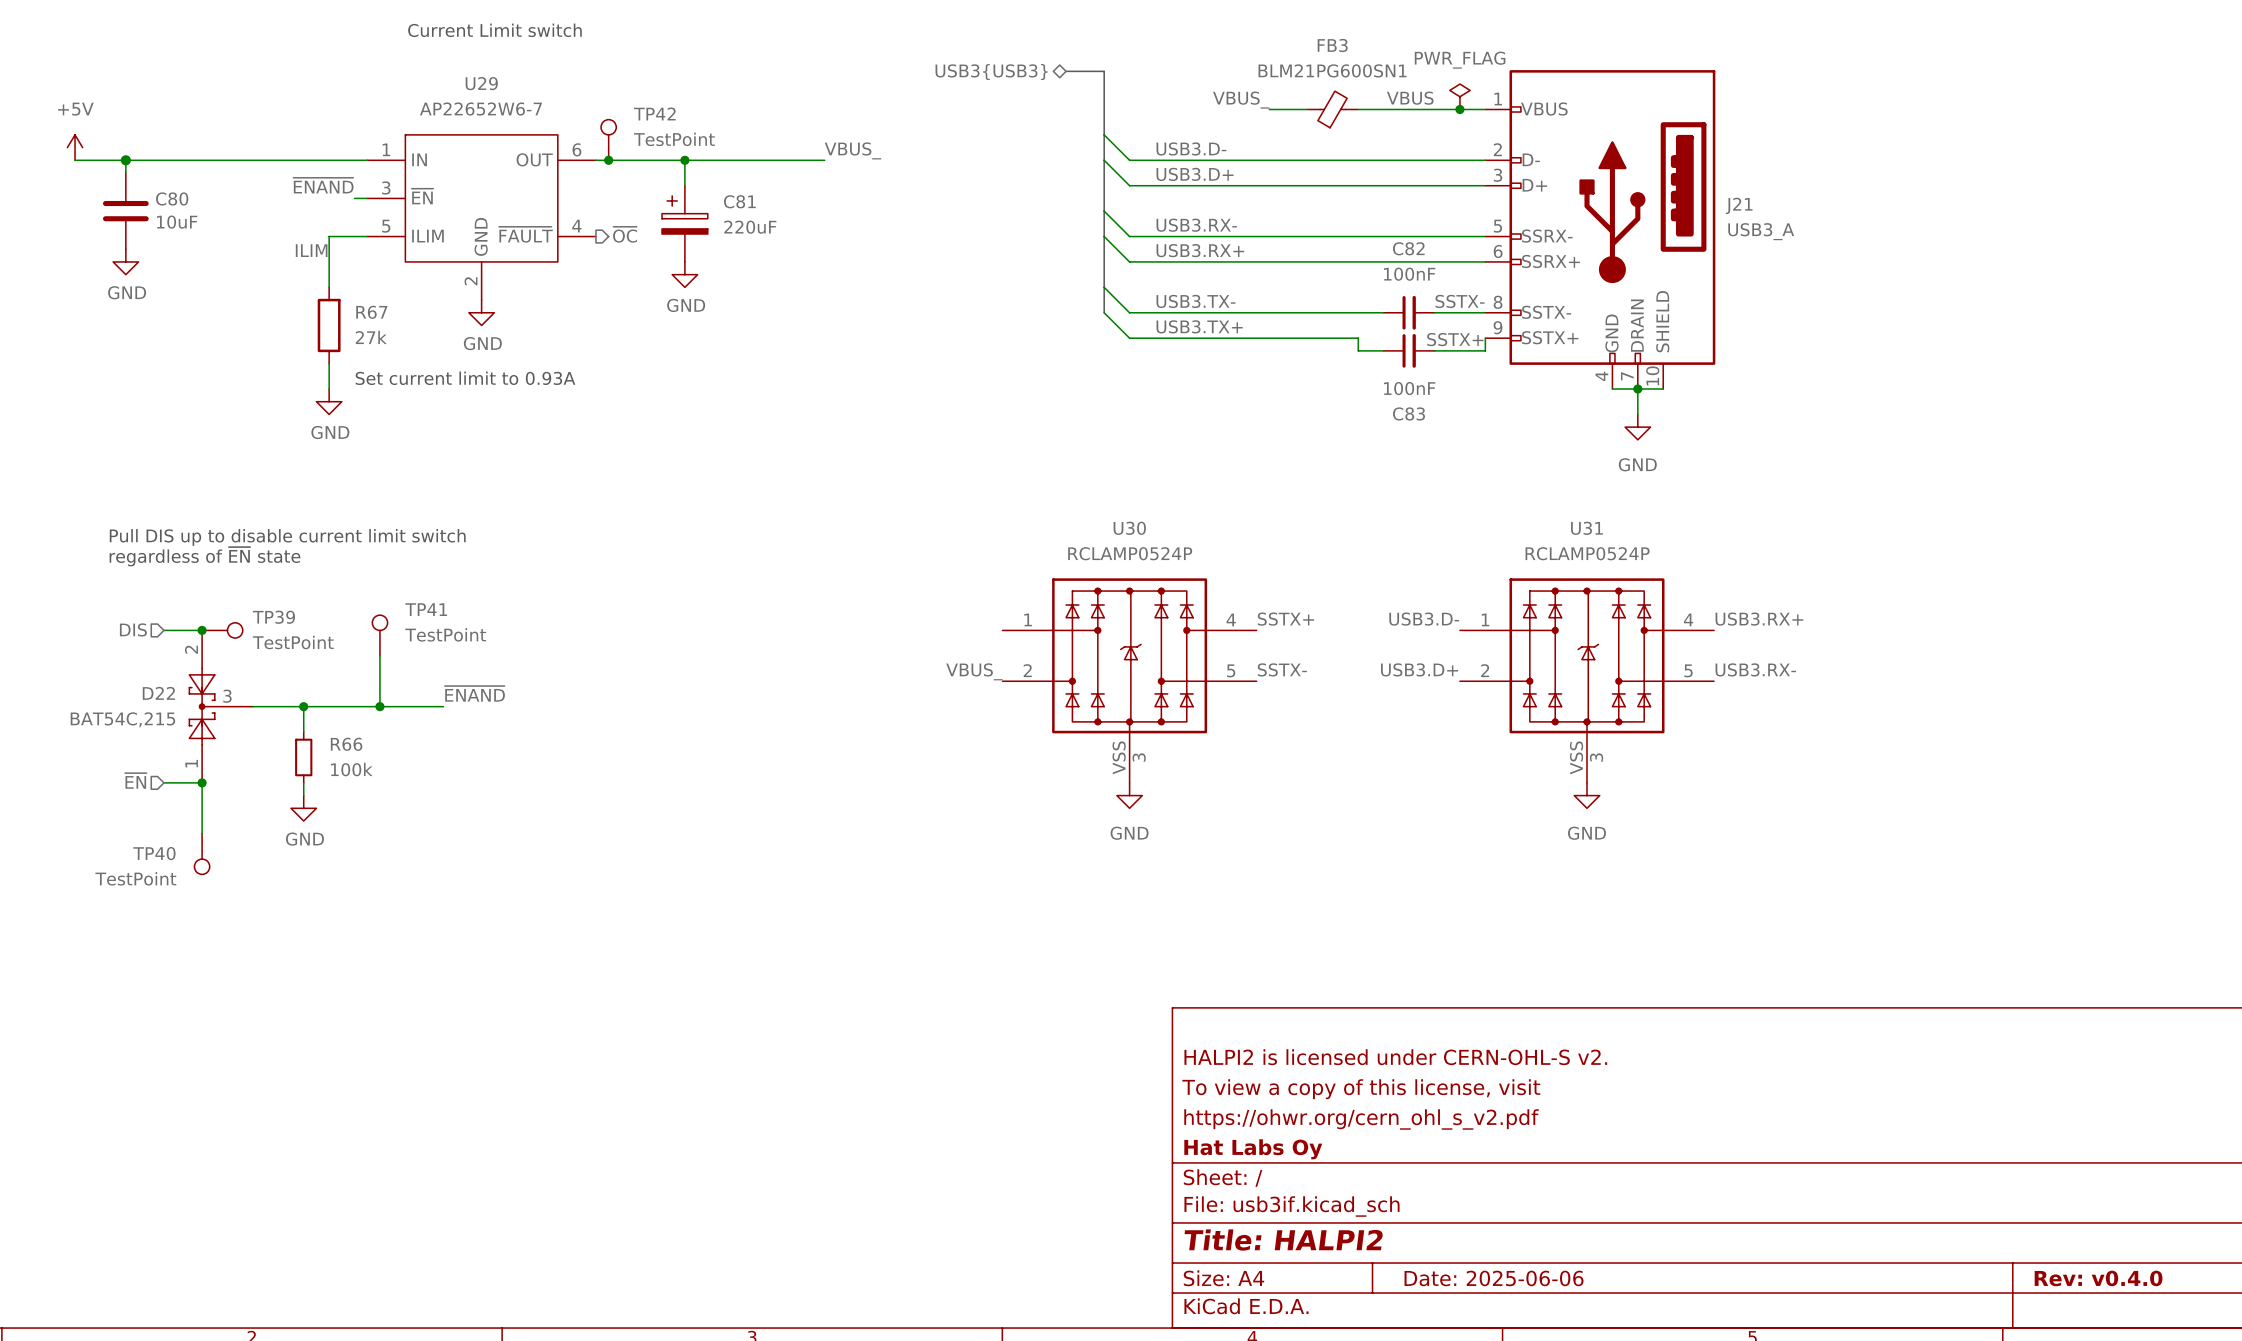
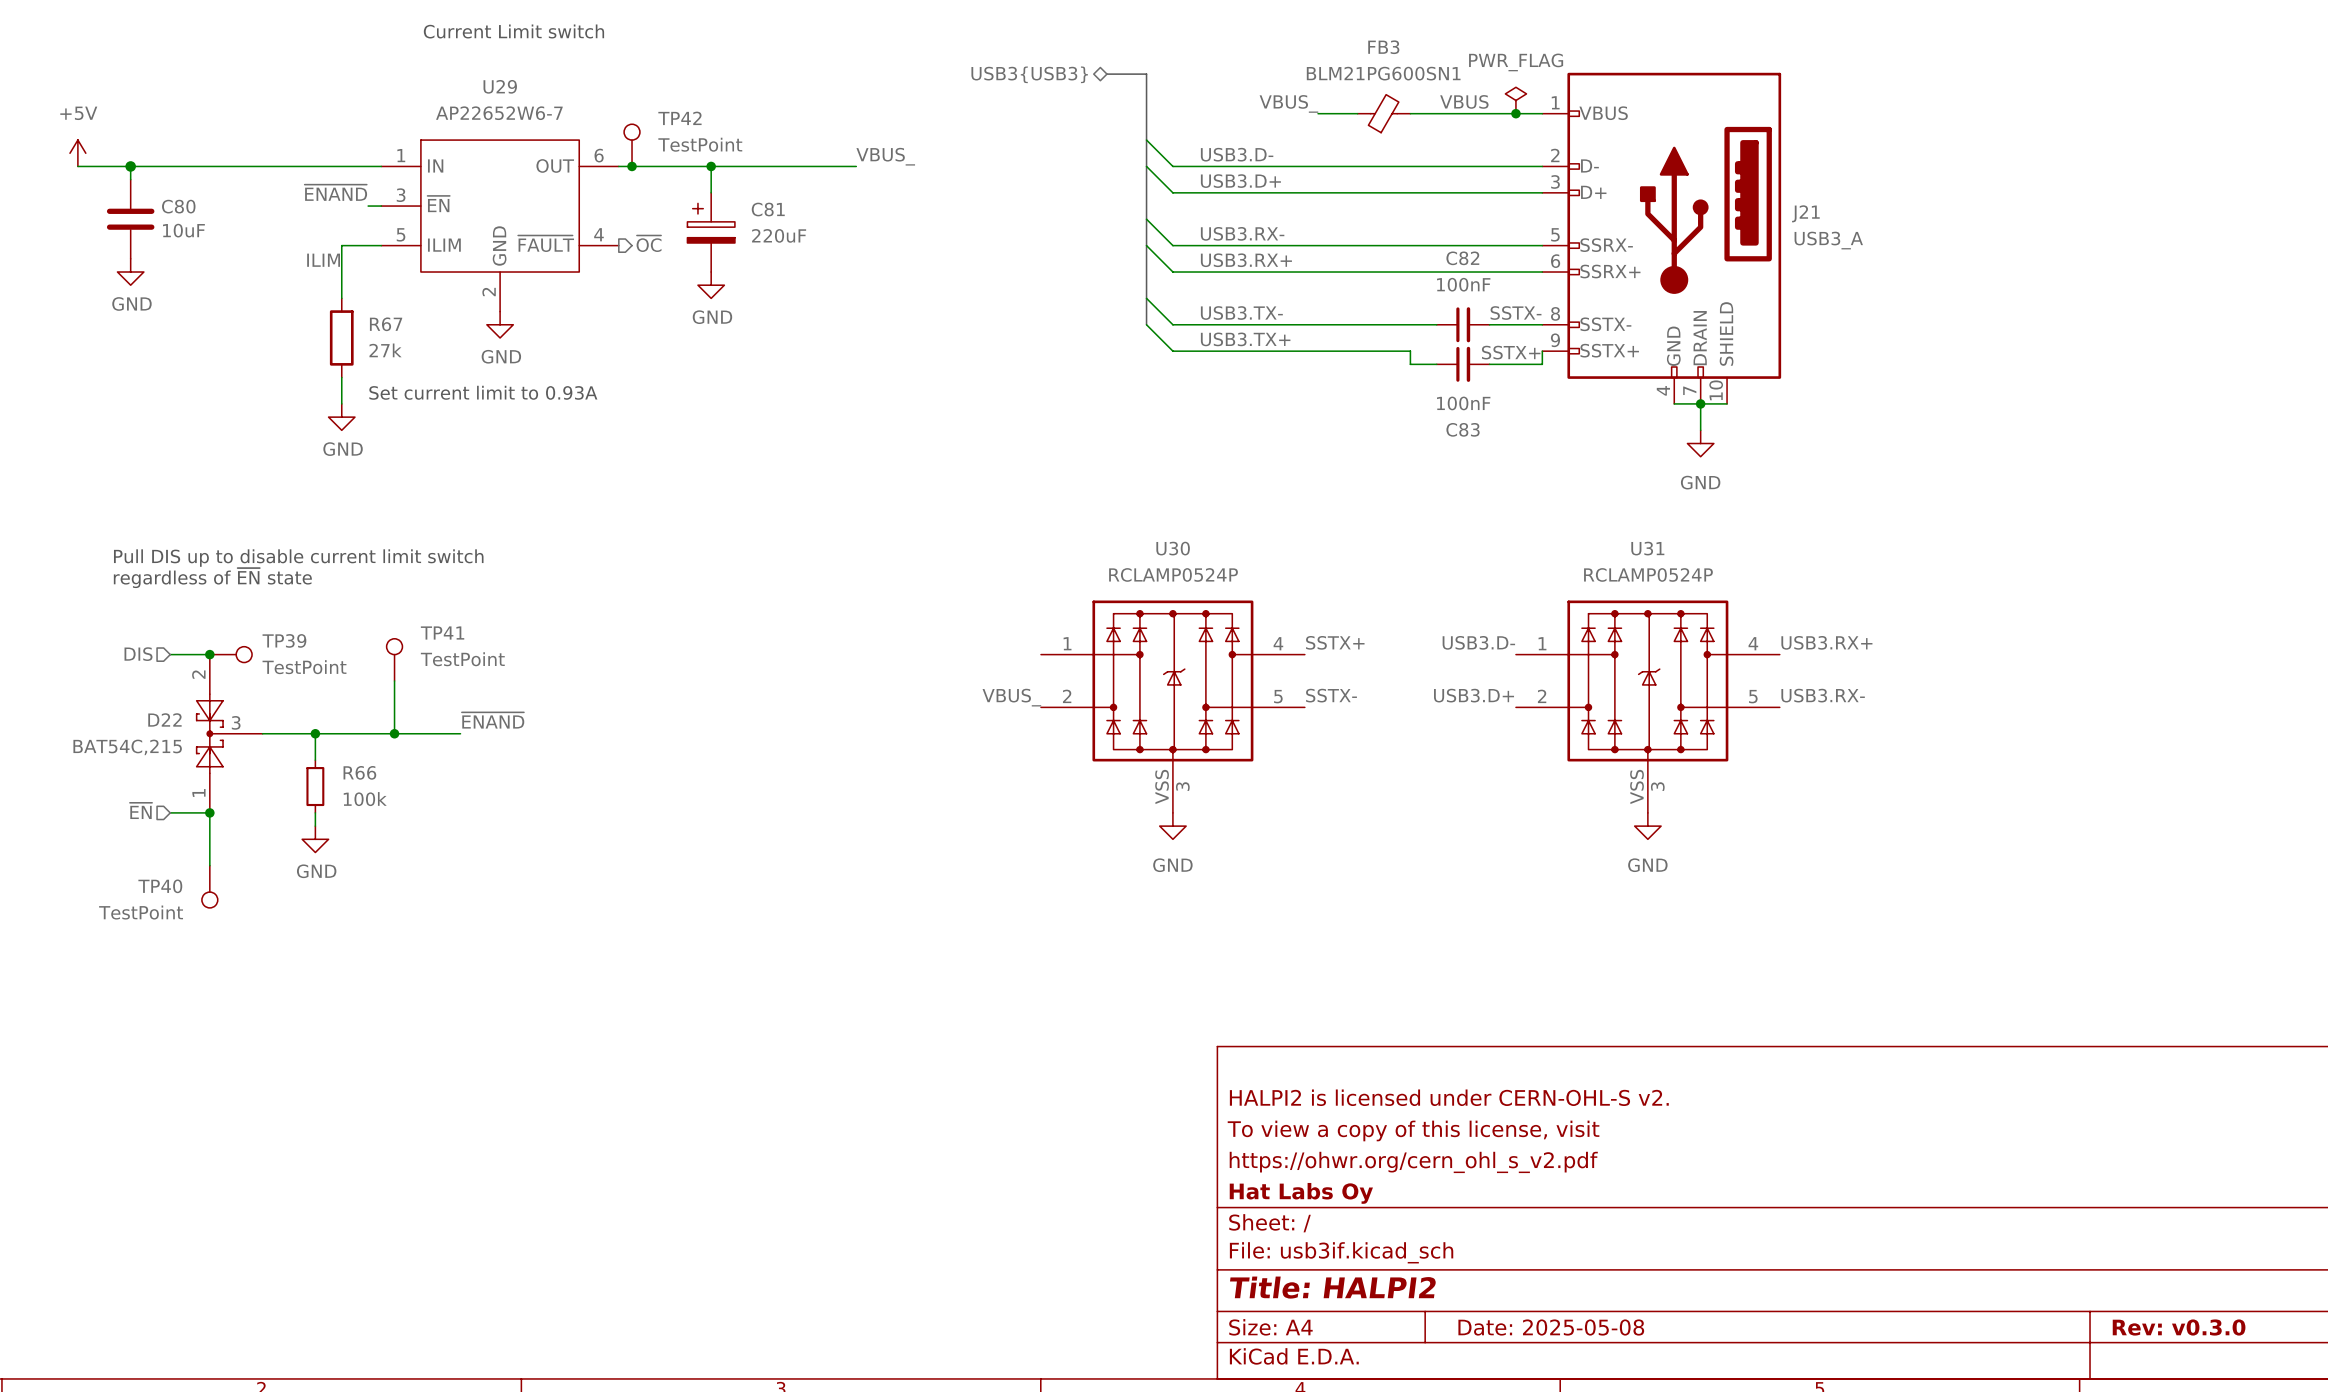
title block: Date: 2025-06-06 (1494, 1278) -> Date: 2025-05-08 (1551, 1327)
title block: Rev: v0.4.0 (2098, 1278) -> Rev: v0.3.0 (2179, 1327)

